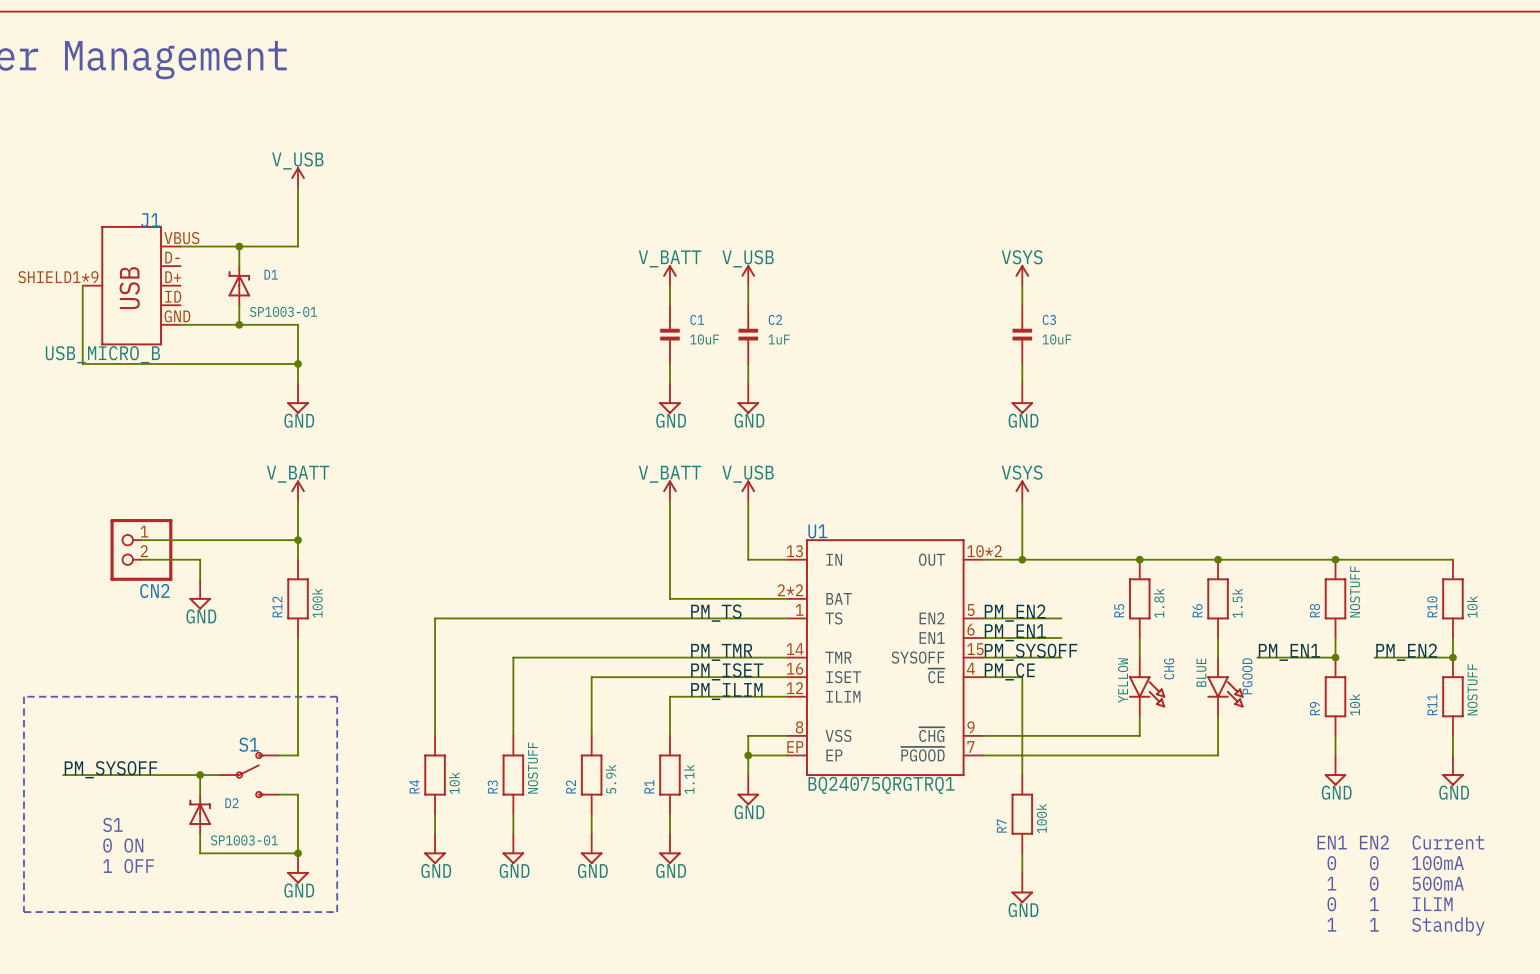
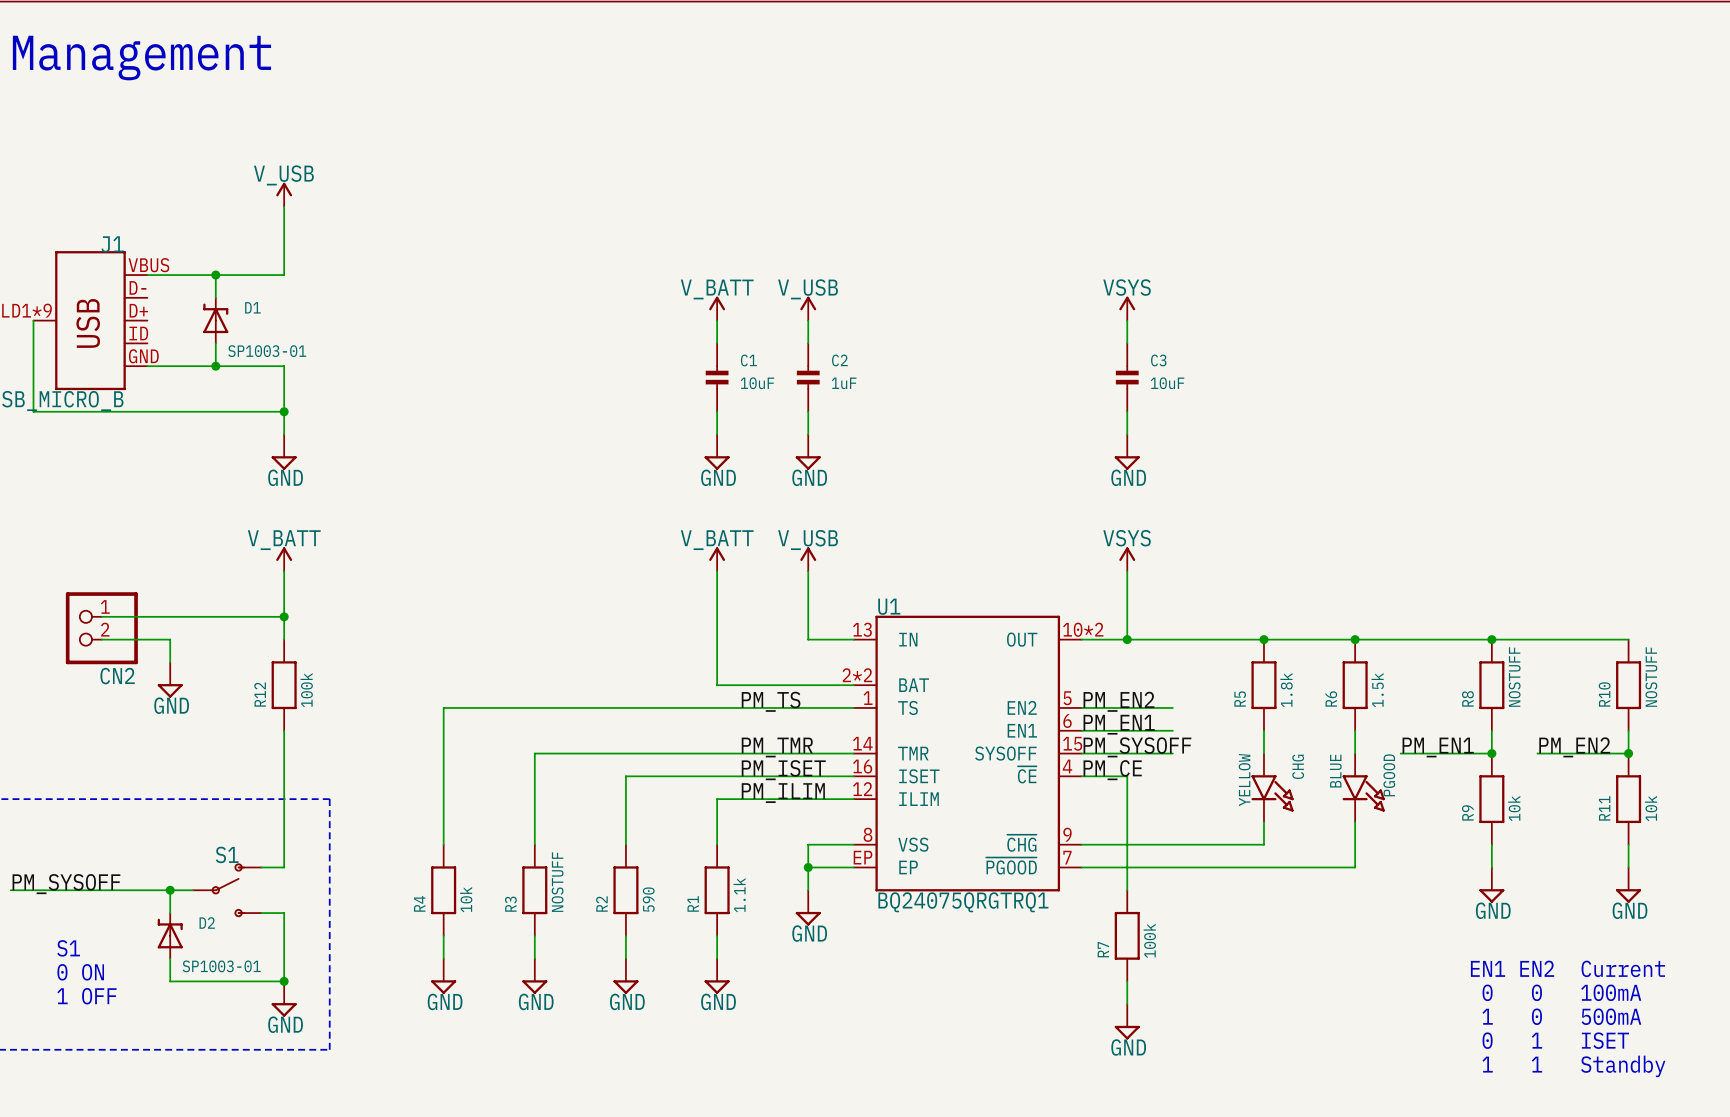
R10 value: 10k (1472, 606) -> NOSTUFF (1651, 677)
R11 value: NOSTUFF (1472, 689) -> 10k (1651, 808)
R2 value: 5.9k (611, 779) -> 590 (648, 899)
text: 0 1 ILIM (1390, 904) -> 0 1 ISET (1555, 1040)

